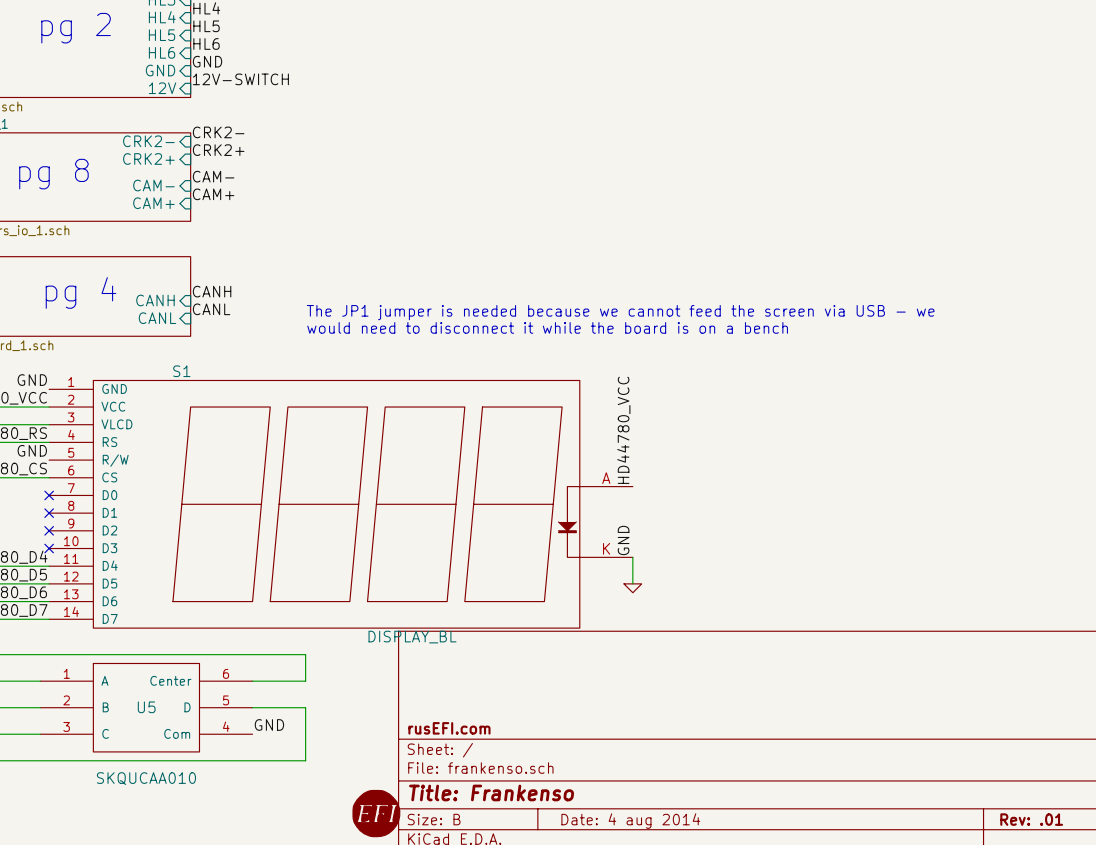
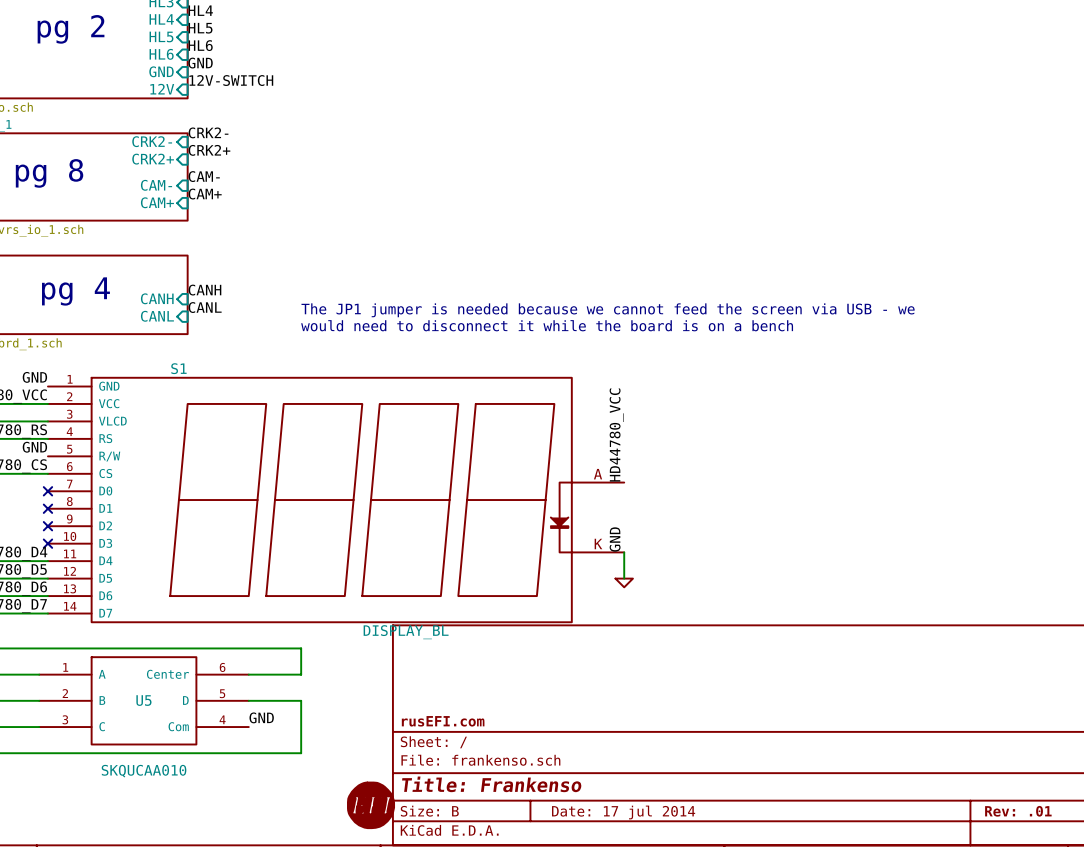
title block: Date: 4 aug 2014 (630, 821) -> Date: 17 jul 2014 (623, 812)

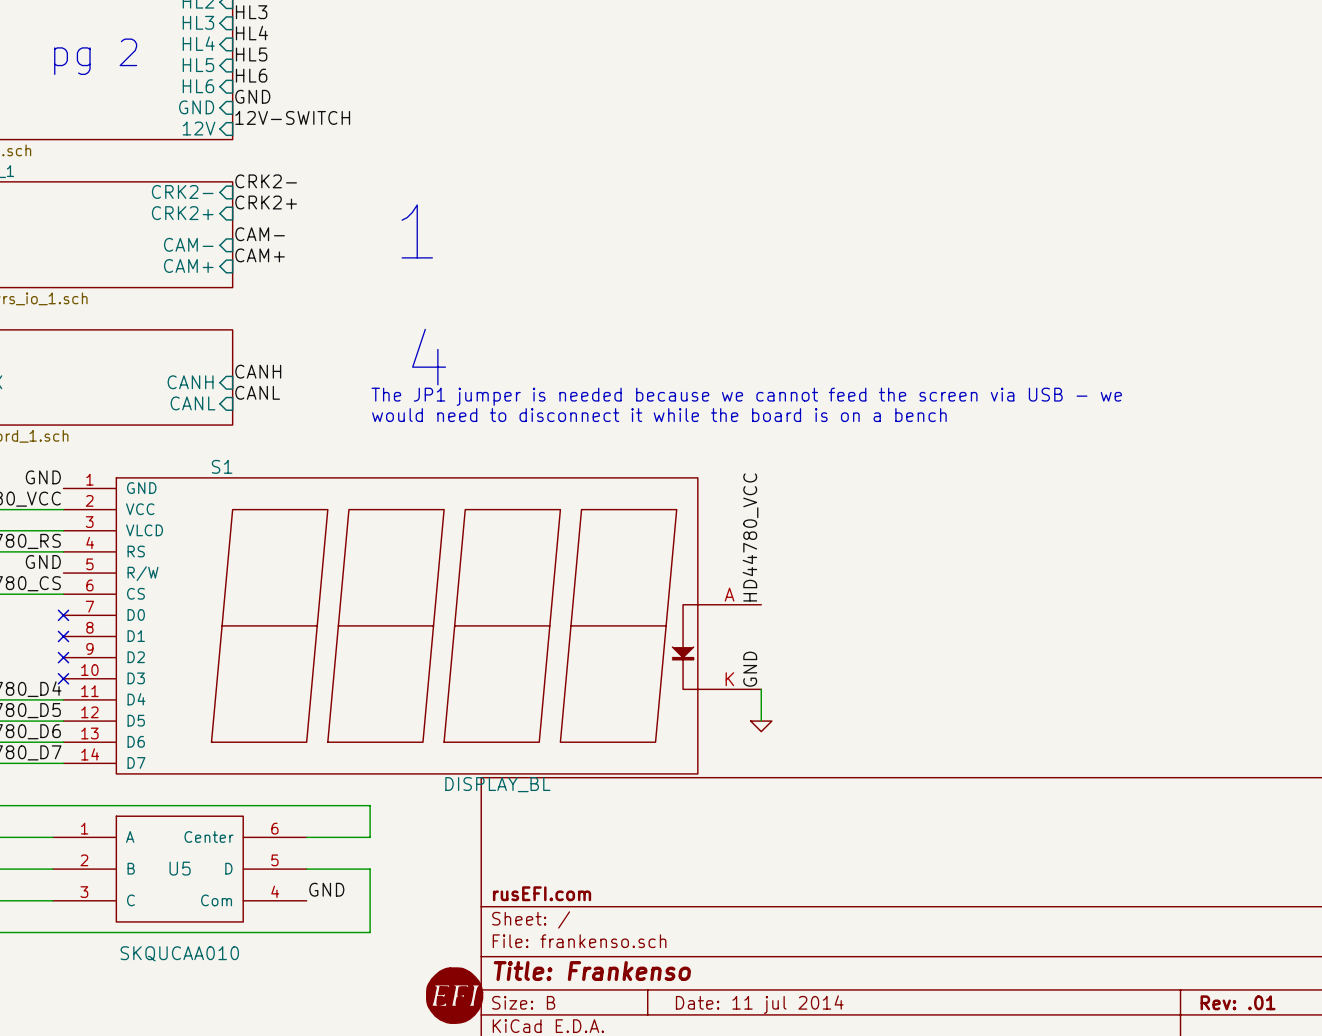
text: pg 8 (49, 173) -> none
text: none -> 1 (417, 231)
text: none -> 4 (429, 357)
text: pg 4 (75, 291) -> none
title block: Date: 17 jul 2014 (623, 812) -> Date: 11 jul 2014 (759, 1004)

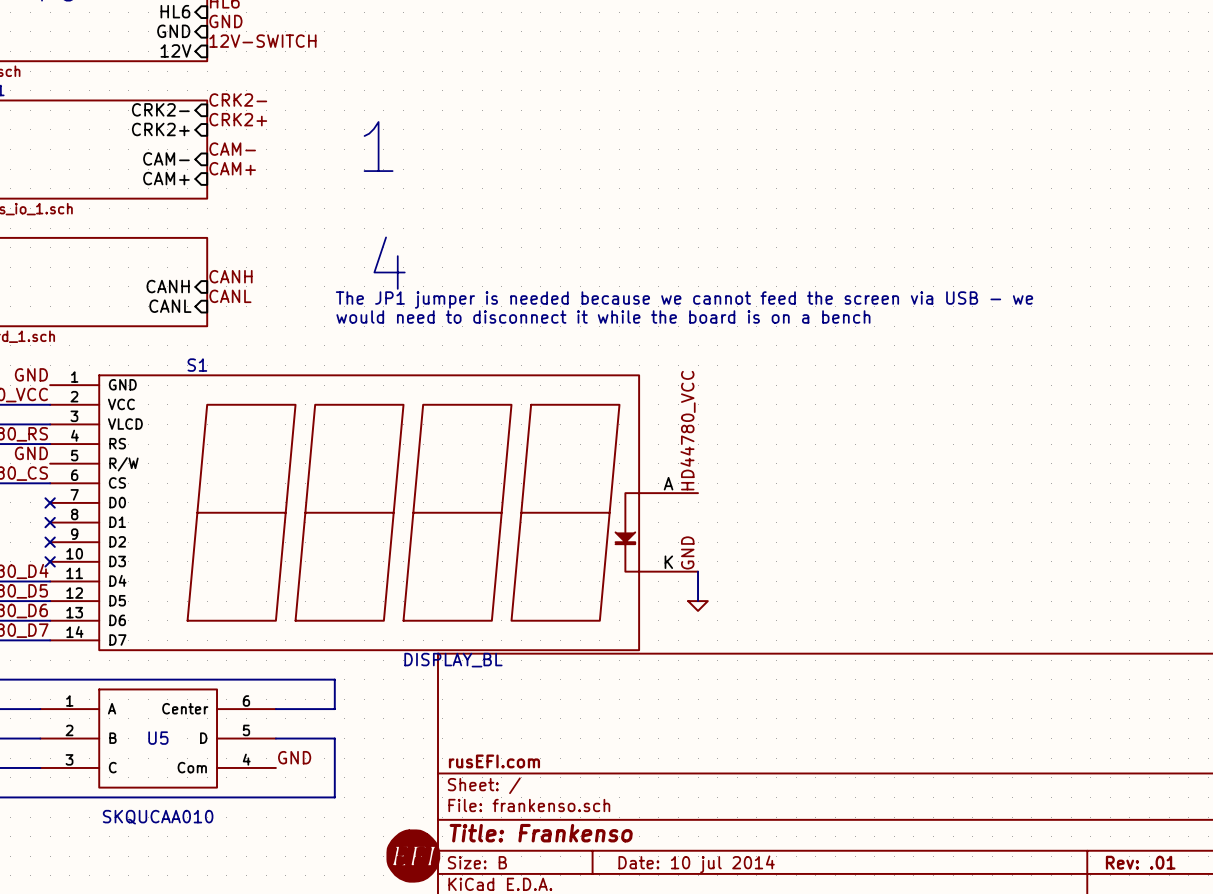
title block: Date: 11 jul 2014 (759, 1004) -> Date: 10 jul 2014 (696, 864)

